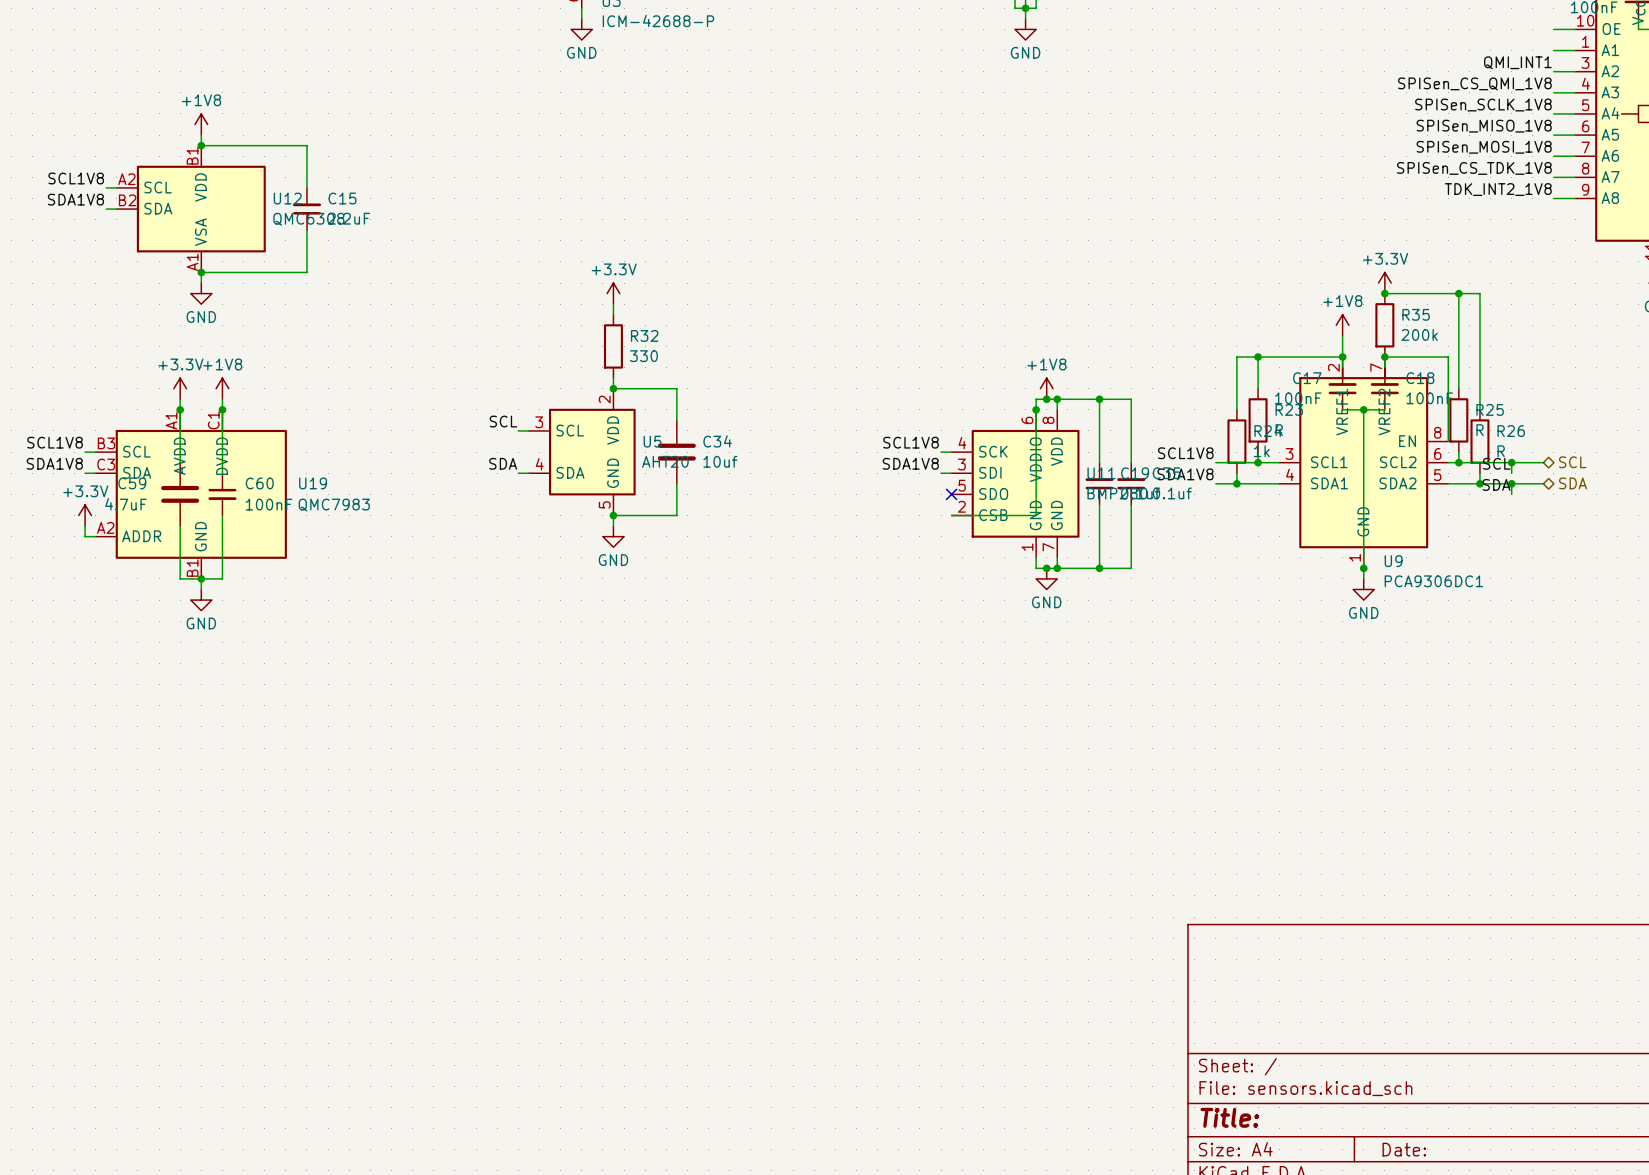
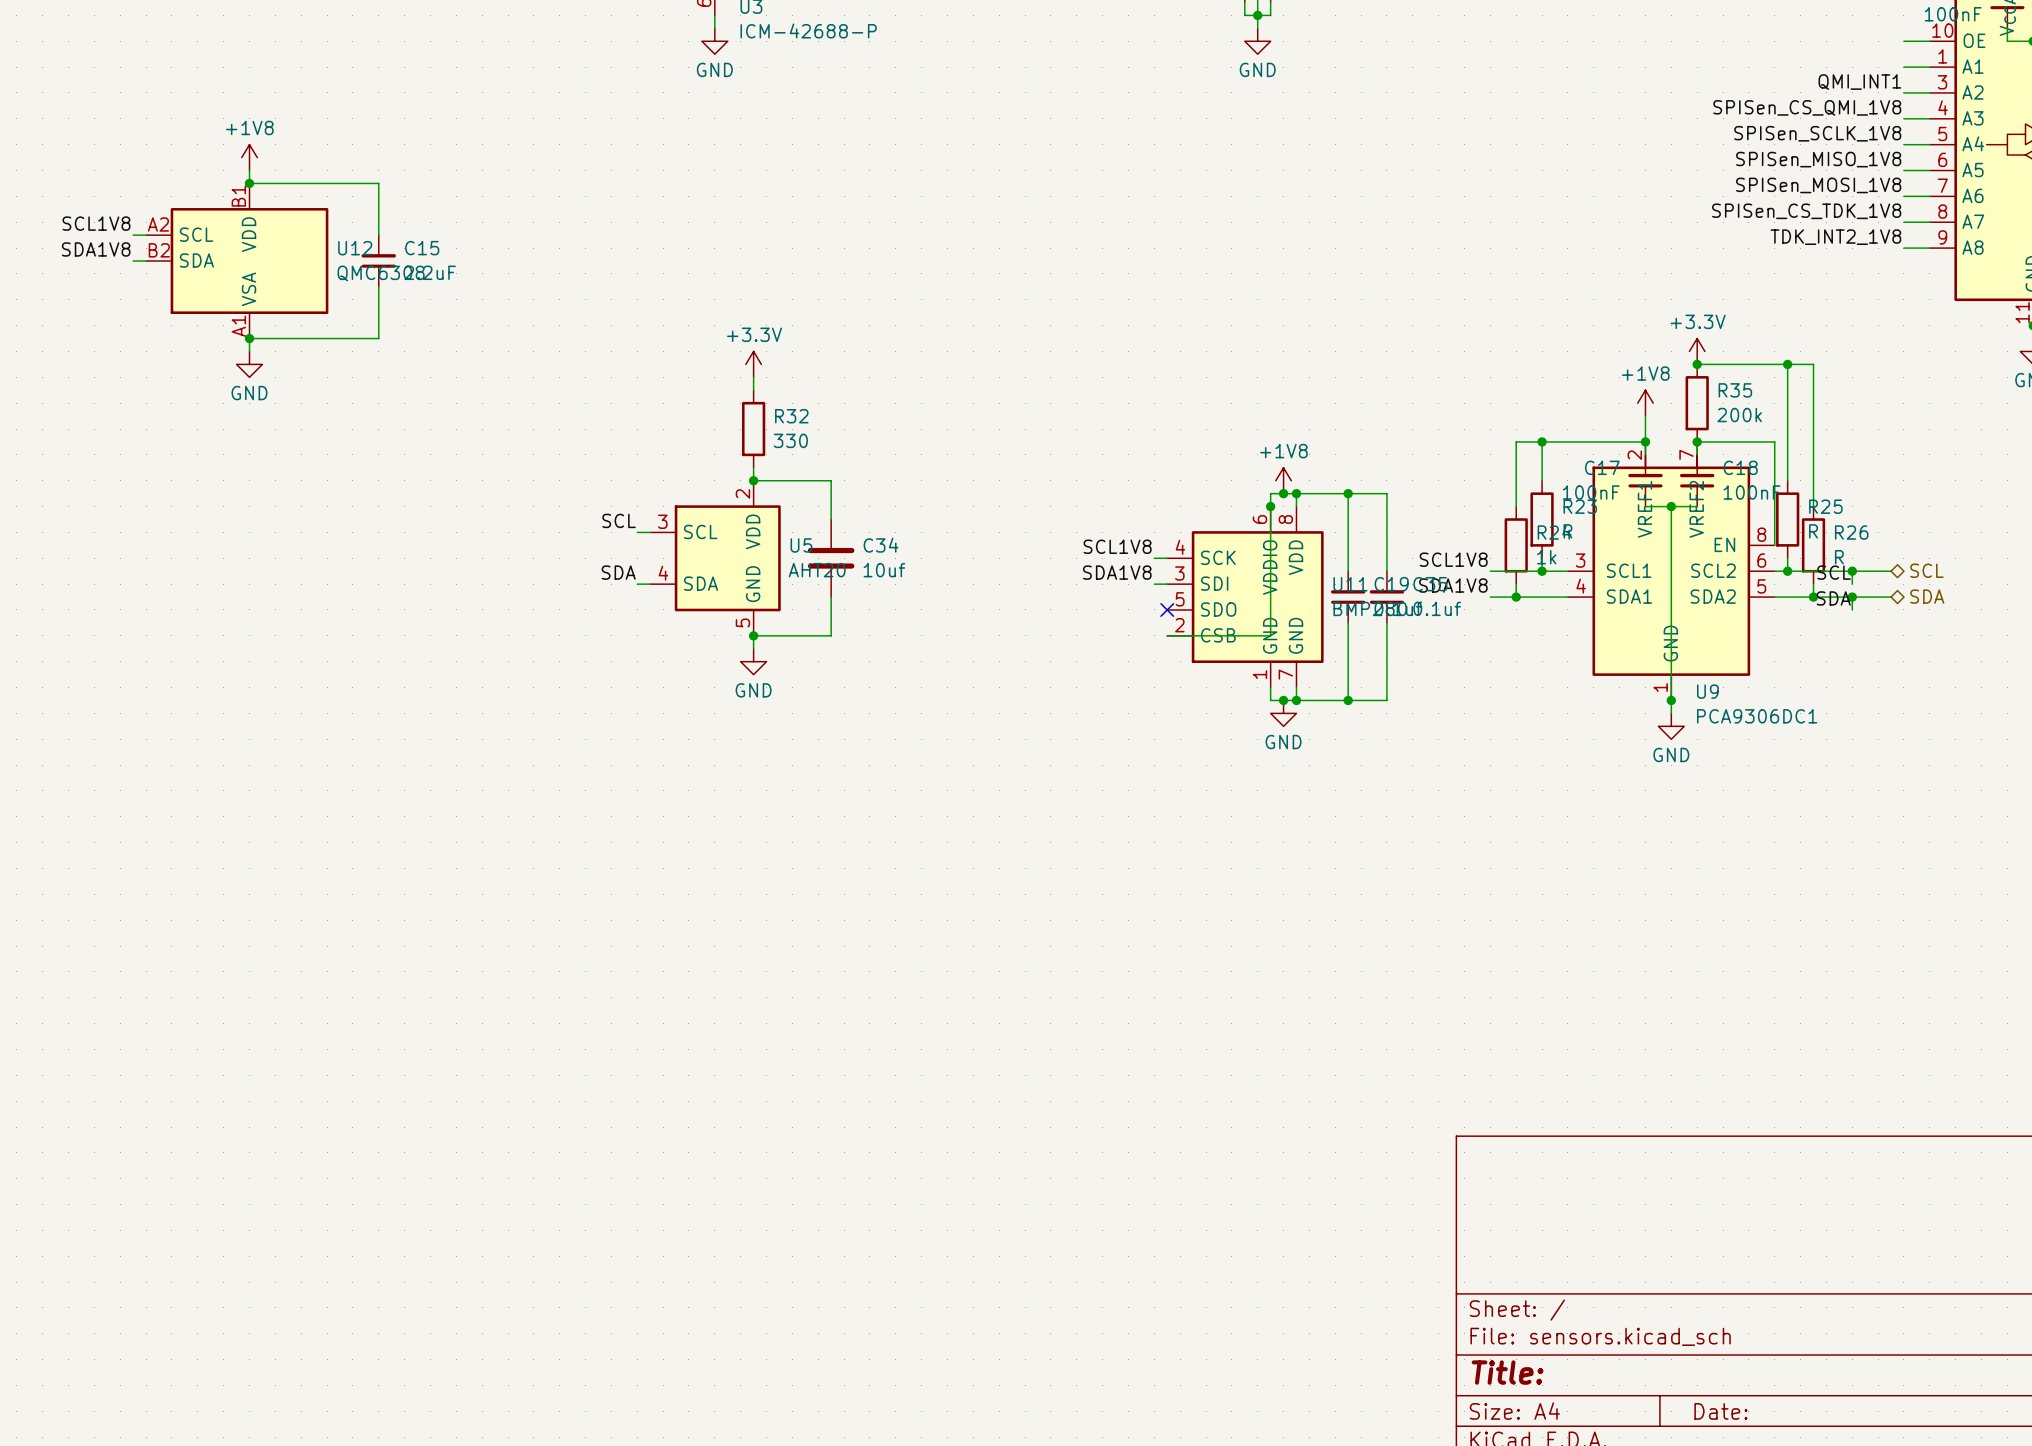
power symbol: +3.3V (180, 388) -> none
power symbol: +1V8 (222, 388) -> none
wire: (180, 399) (180, 462) -> none
wire: (222, 399) (222, 473) -> none
junction: (180, 409) -> none
junction: (222, 409) -> none
label: SCL1V8 (55, 442) -> none
wire: (85, 452) (95, 452) -> none
label: SDA1V8 (54, 463) -> none
wire: (85, 473) (95, 473) -> none
C59: 4.7uF (180, 494) -> none
U19: QMC7983 (191, 494) -> none
C60: 100nF (222, 494) -> none
power symbol: +3.3V (85, 515) -> none
wire: (222, 515) (222, 578) (180, 578) (180, 526) -> none
wire: (85, 526) (85, 536) (95, 536) -> none
wire: (201, 578) (201, 589) -> none
junction: (201, 578) -> none
power symbol: GND (201, 600) -> none

